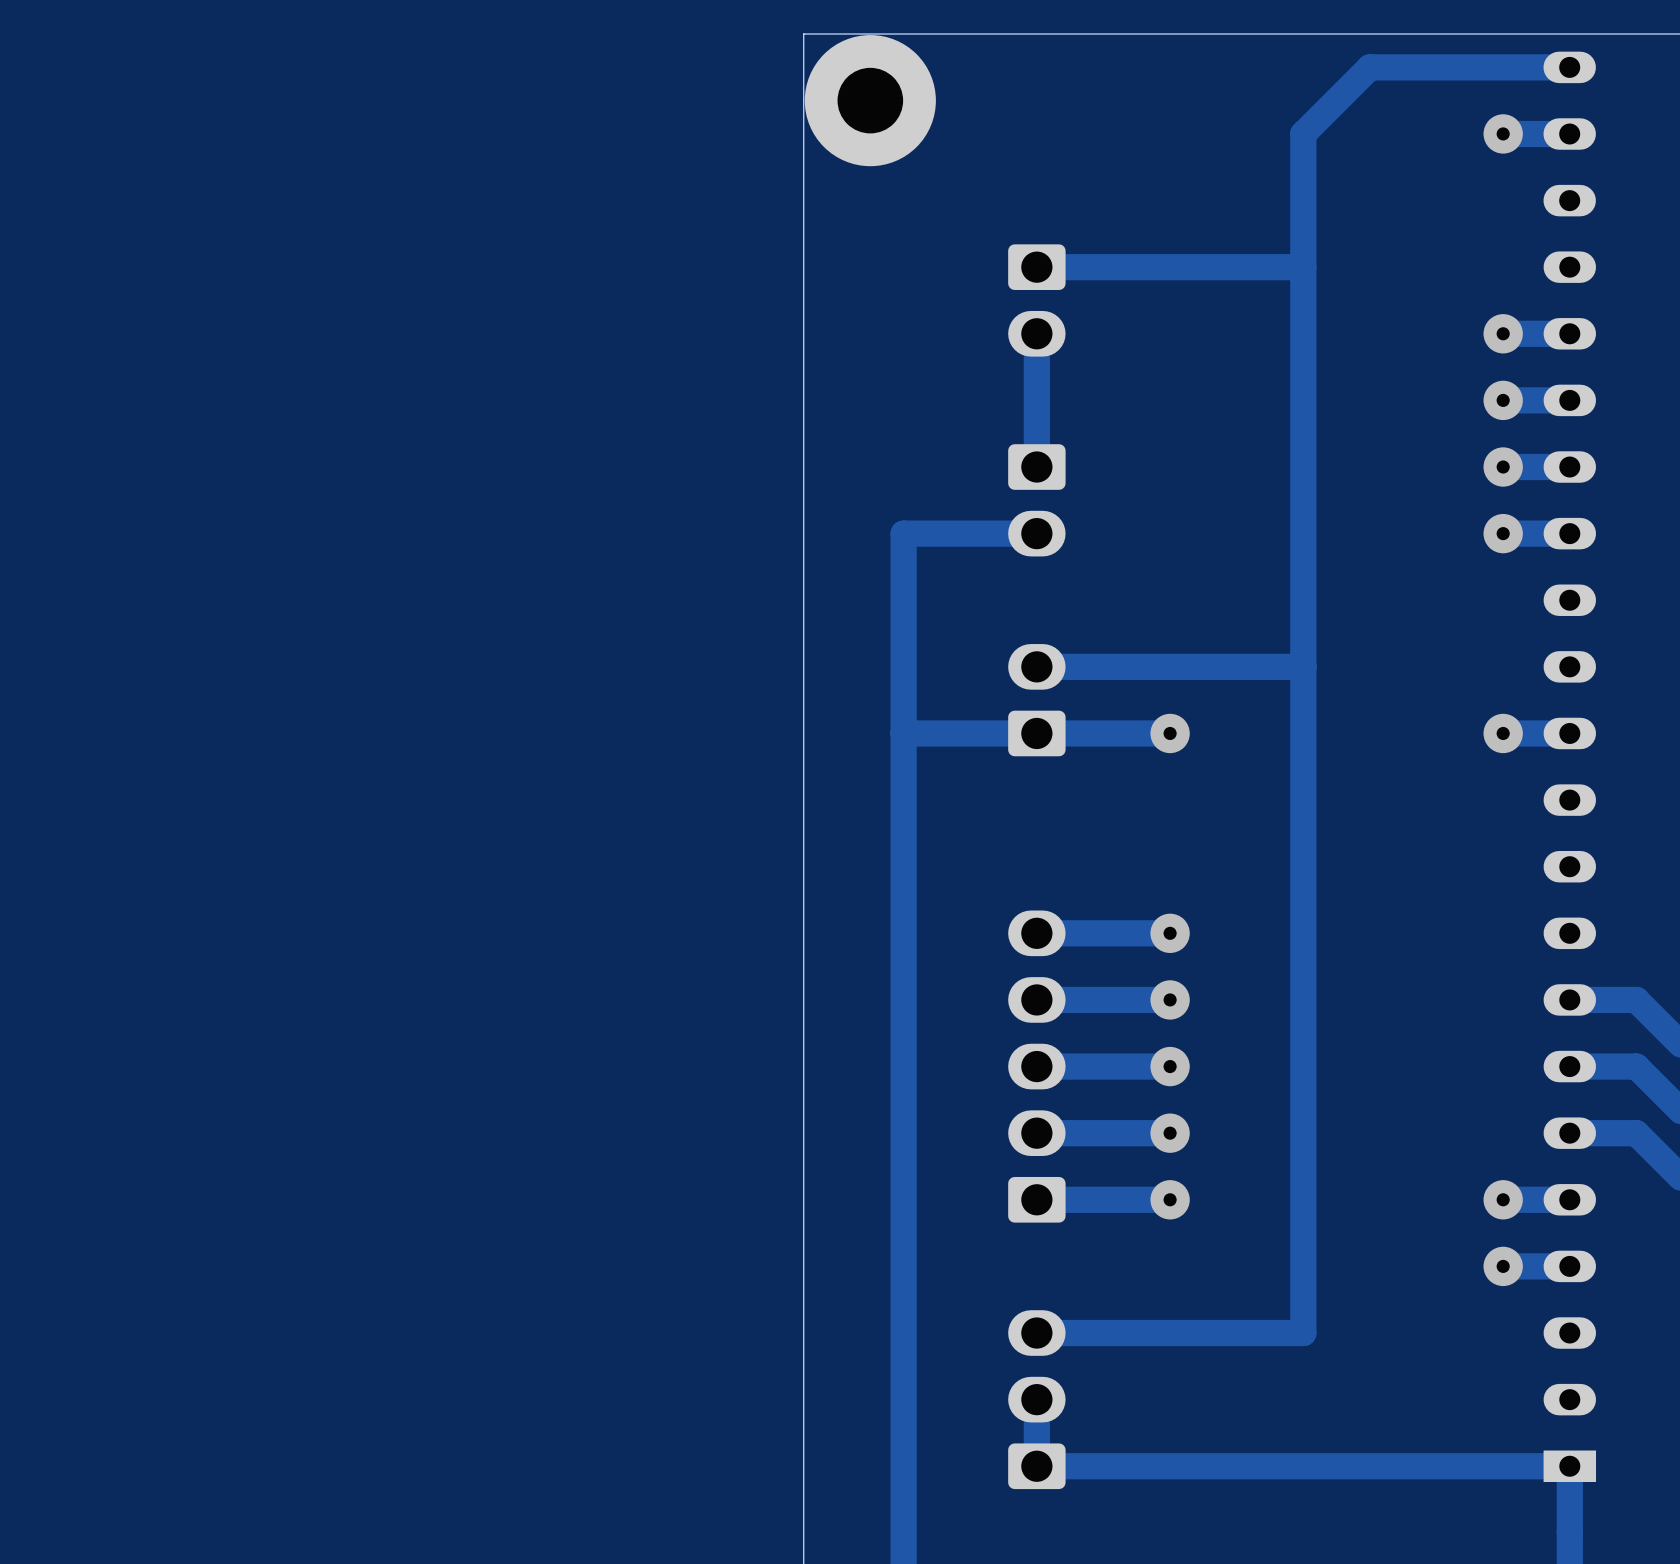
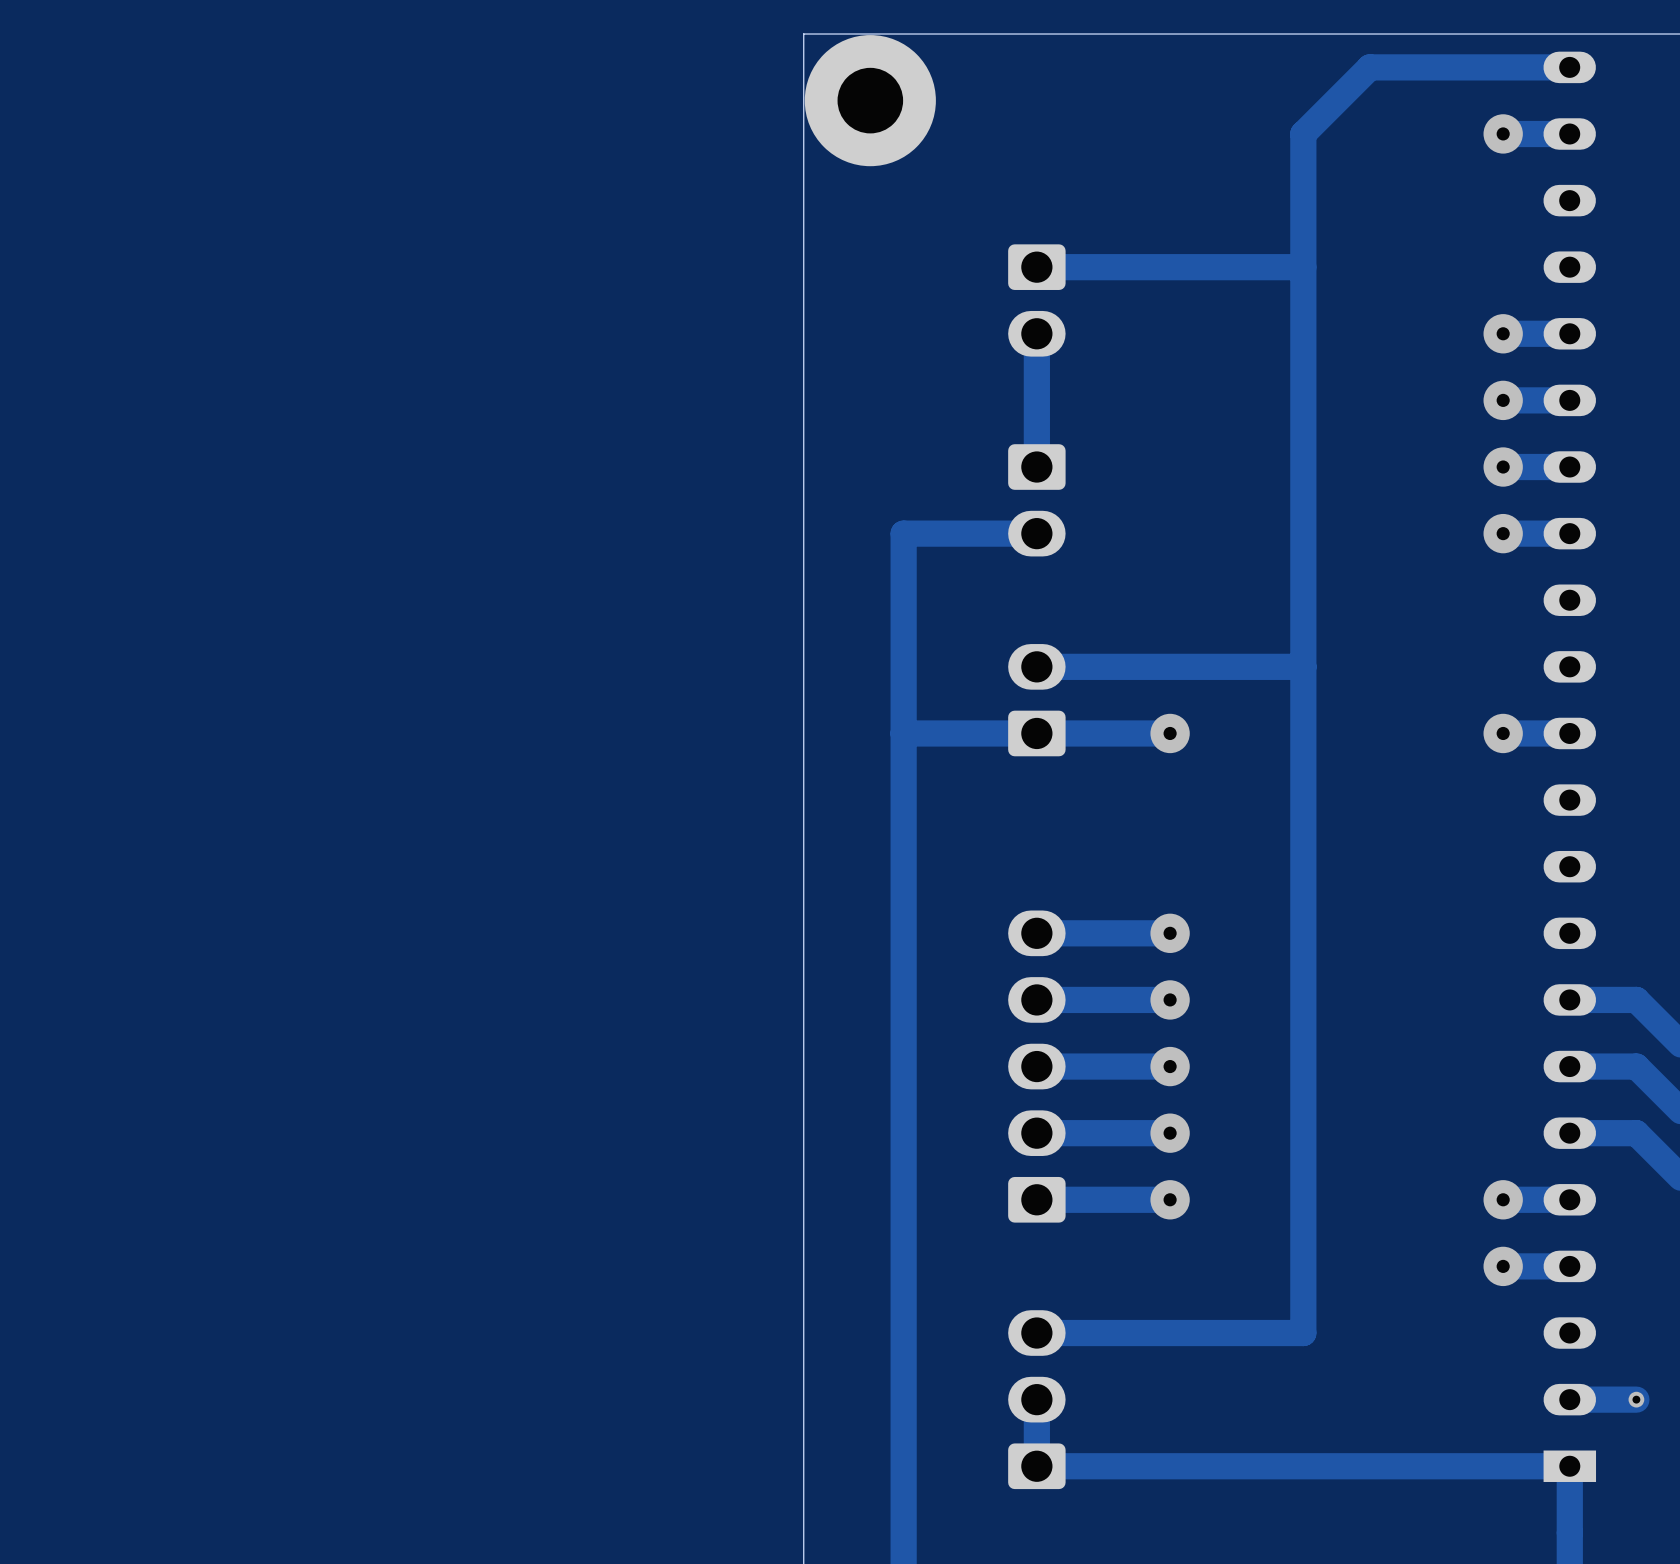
track: none -> (1636, 1399) (1569, 1399)
via: none -> (1636, 1399)

